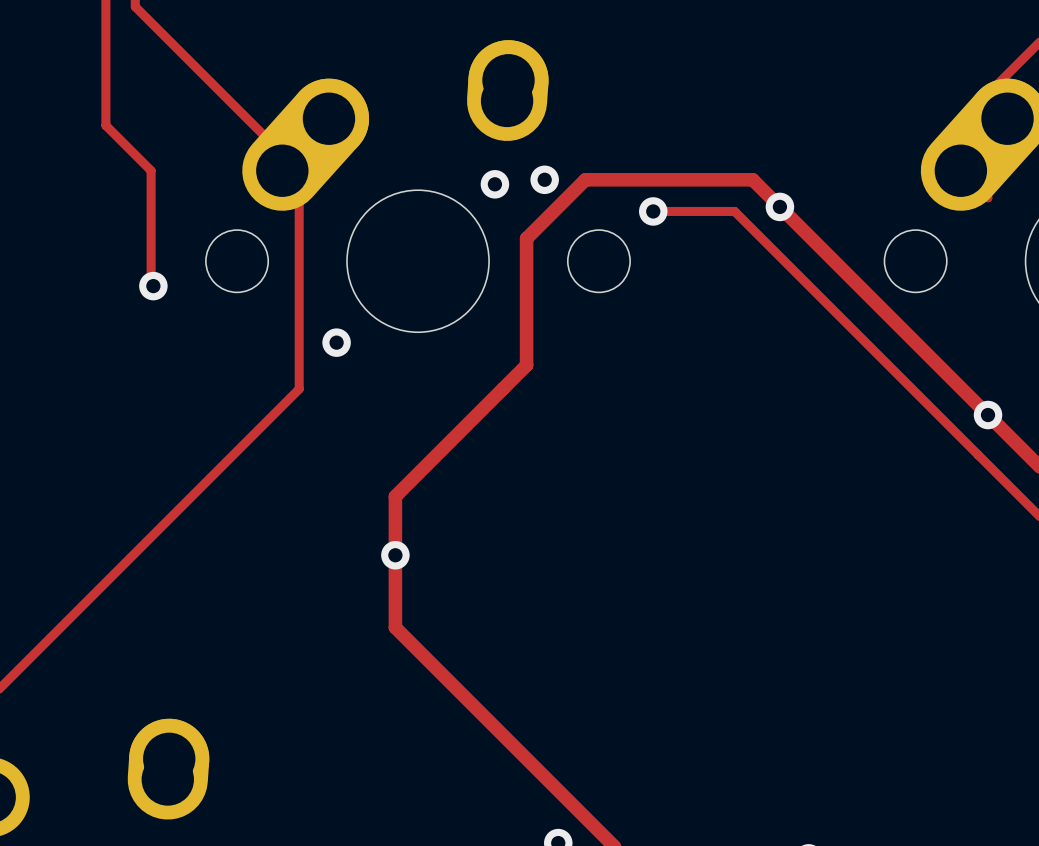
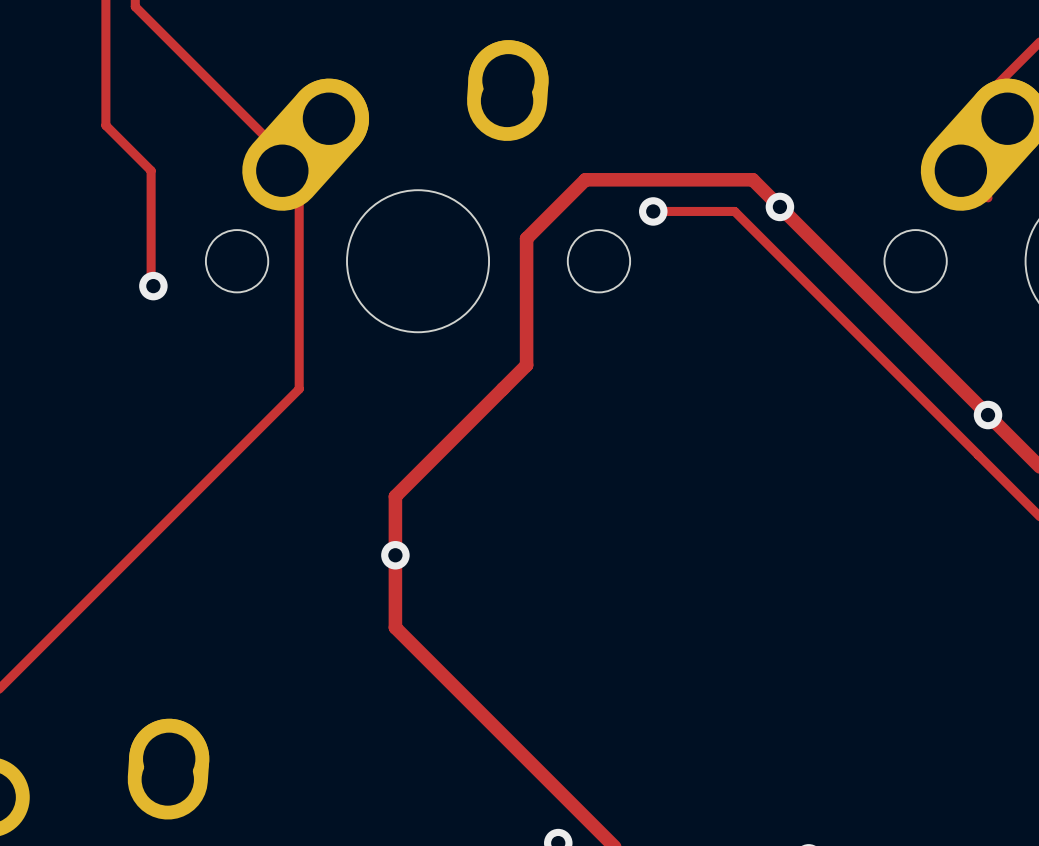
via: (544, 179) -> none
via: (494, 184) -> none
via: (336, 342) -> none

